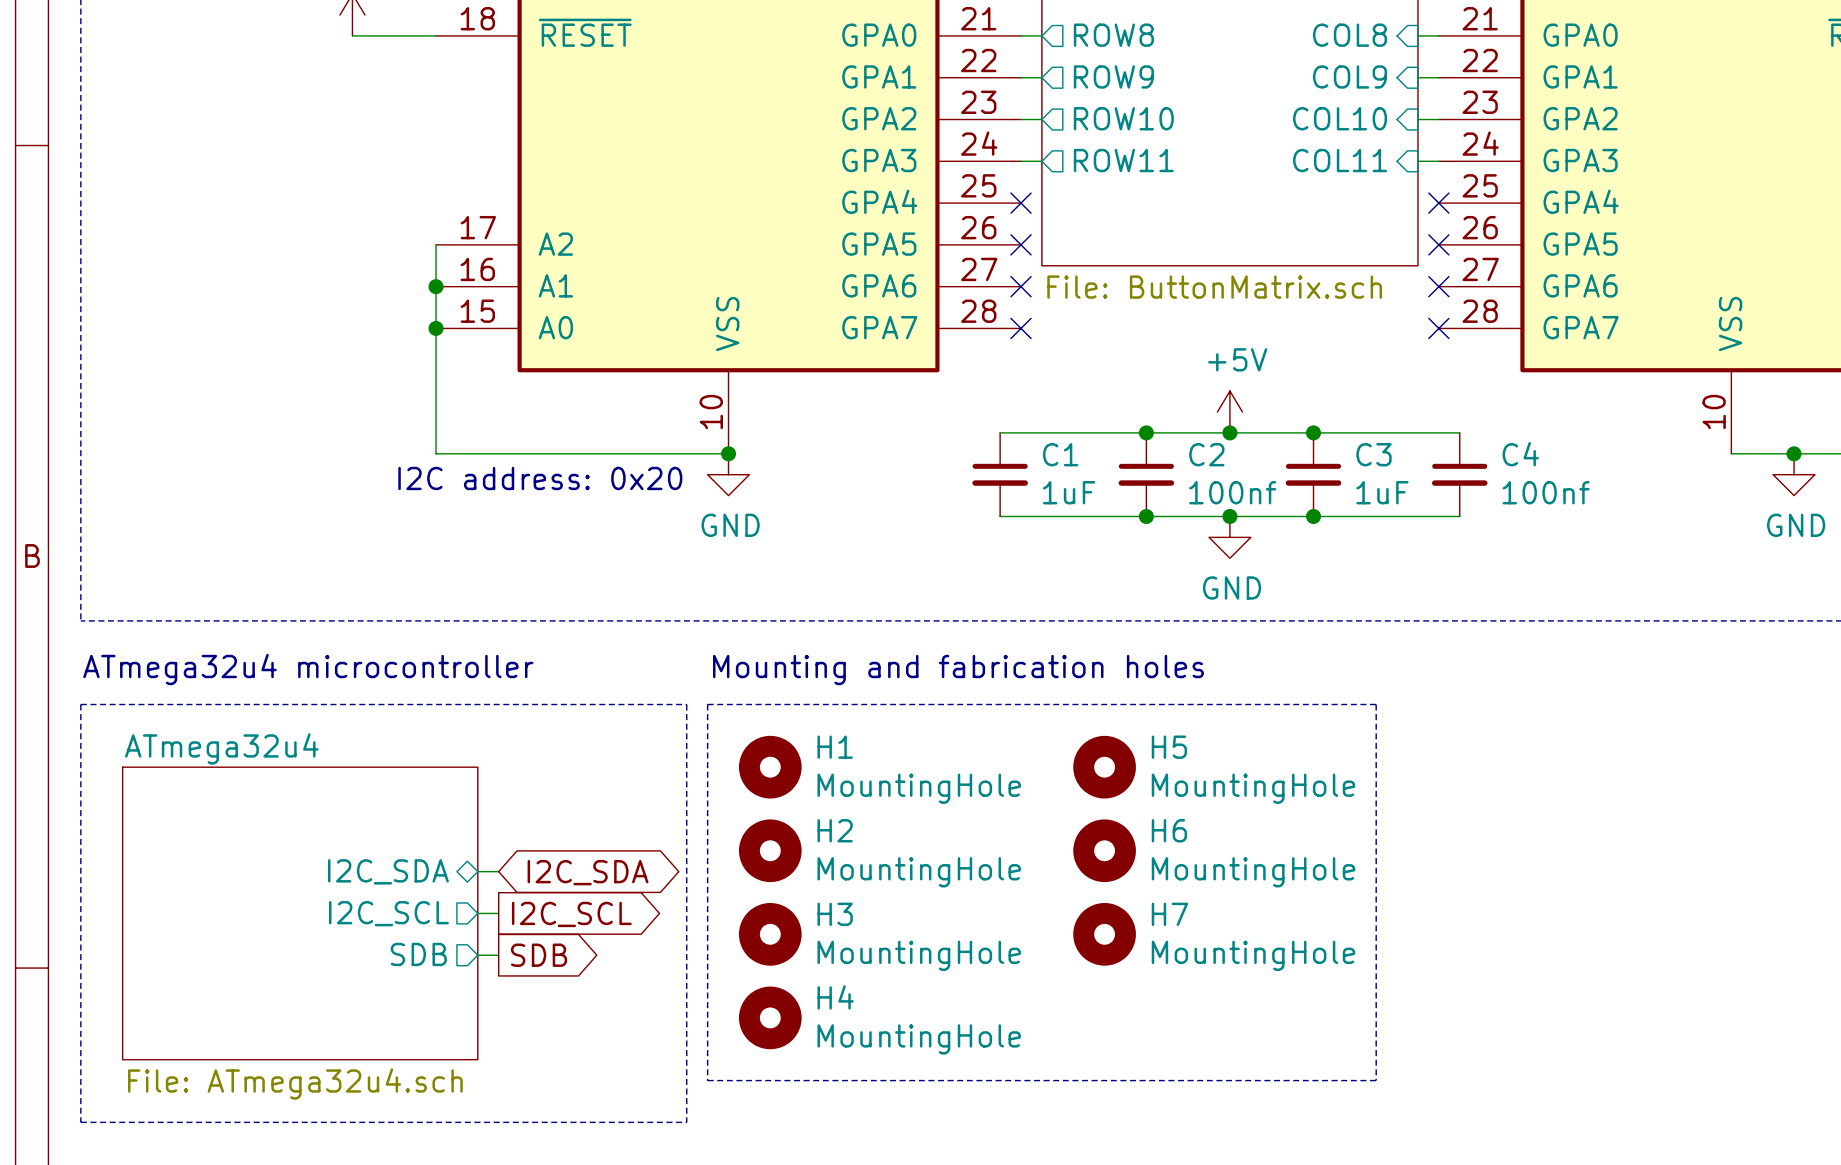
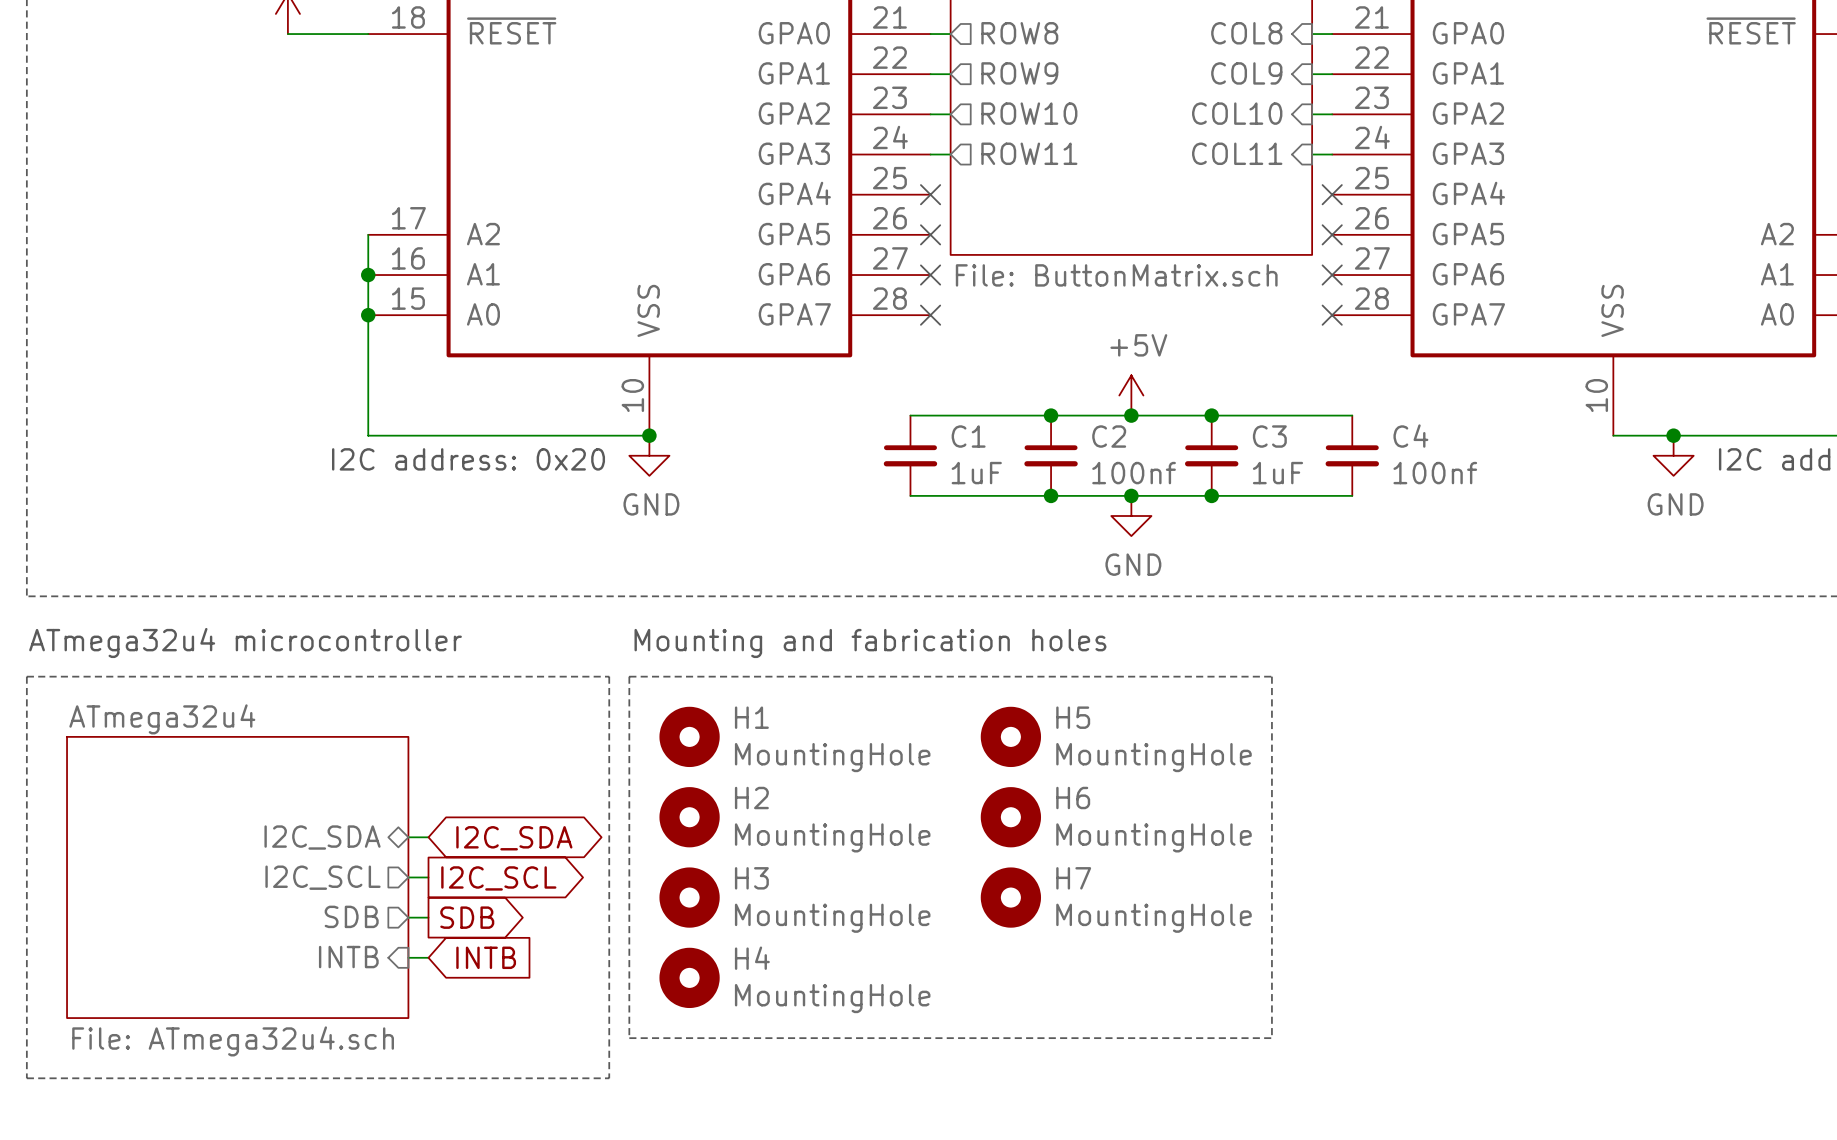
sheet pin: none -> INTB (348, 957)
wire: none -> (408, 957) (428, 957)
global label: none -> INTB (486, 957)

